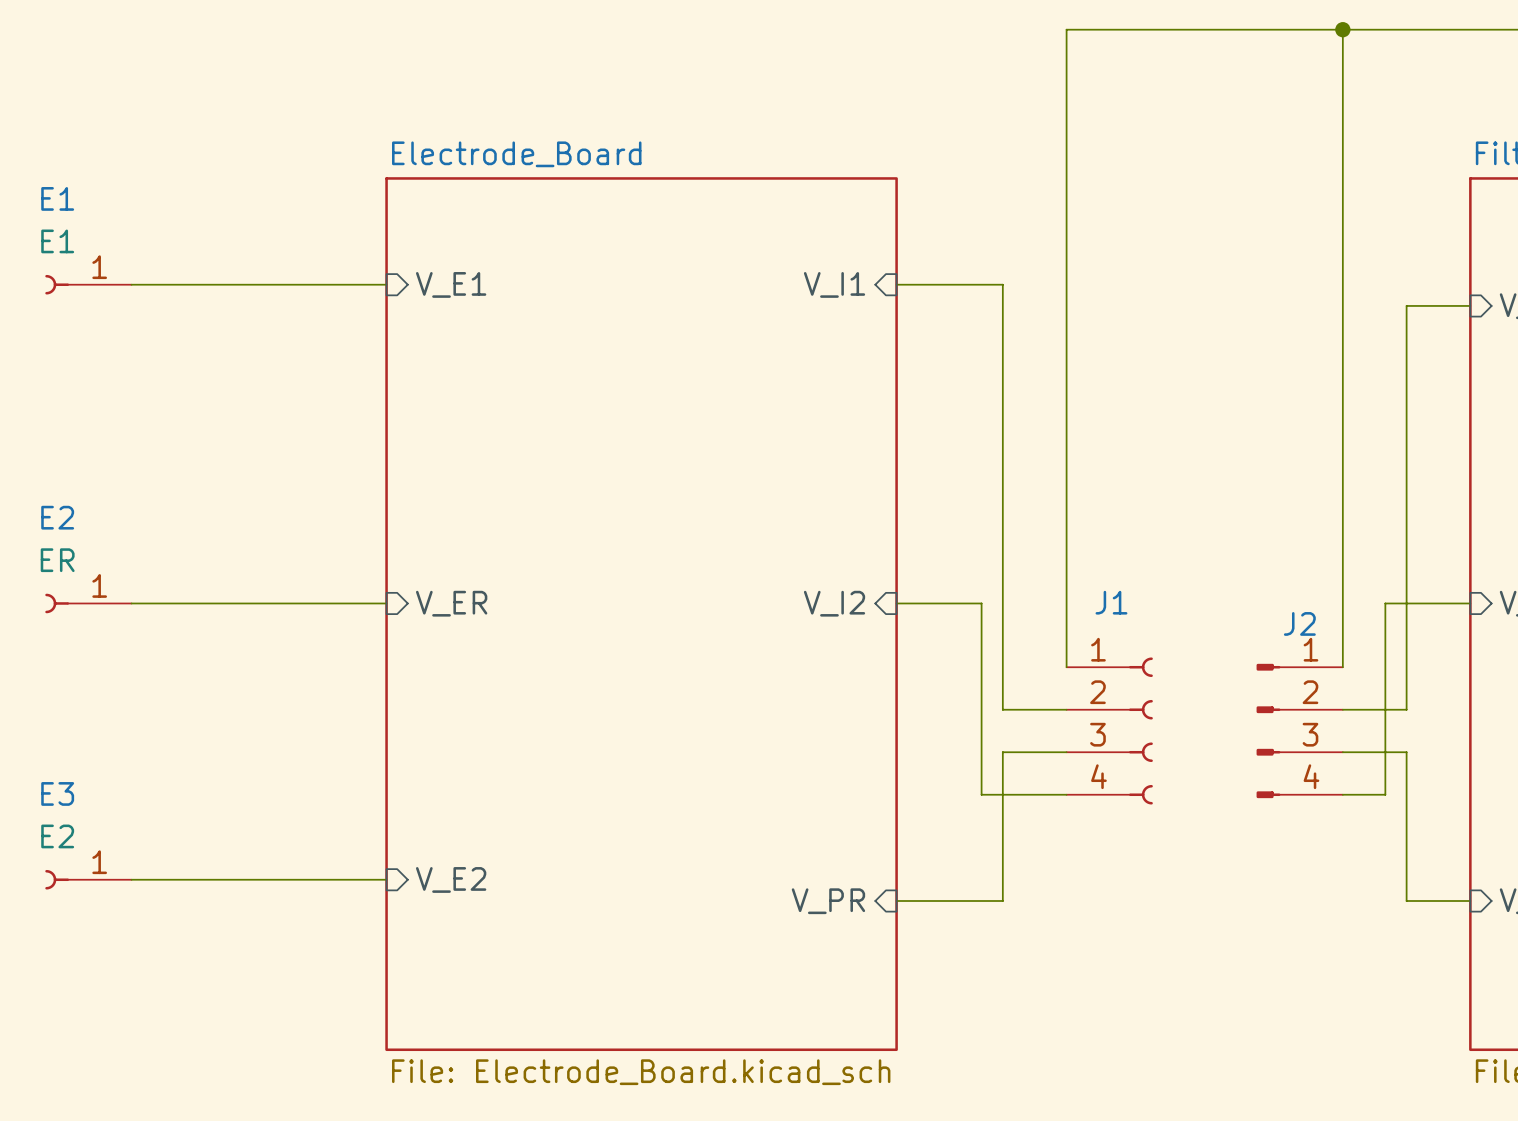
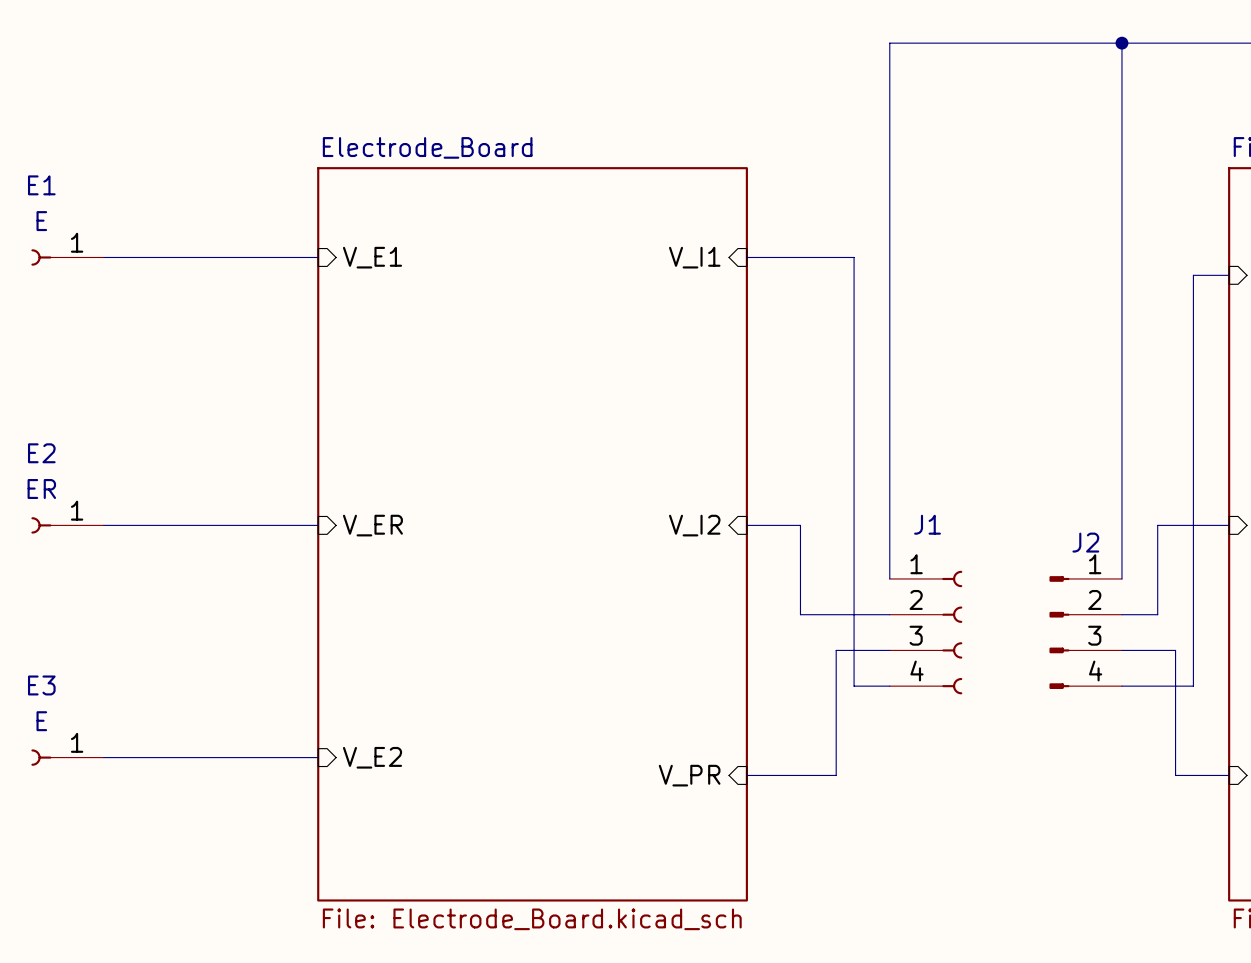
E1 value: E1 (57, 241) -> E (41, 221)
wire: (1002, 284) (1002, 709) -> (836, 257) (854, 257) (854, 686)
wire: (1427, 305) (1406, 305) (1406, 709) (1385, 709) (1385, 794) -> (1193, 275) (1193, 686) (1157, 686)
wire: (960, 603) (981, 603) (981, 794) (1024, 794) -> (800, 525) (800, 614) (836, 614)
E3 value: E2 (57, 836) -> E (41, 721)

